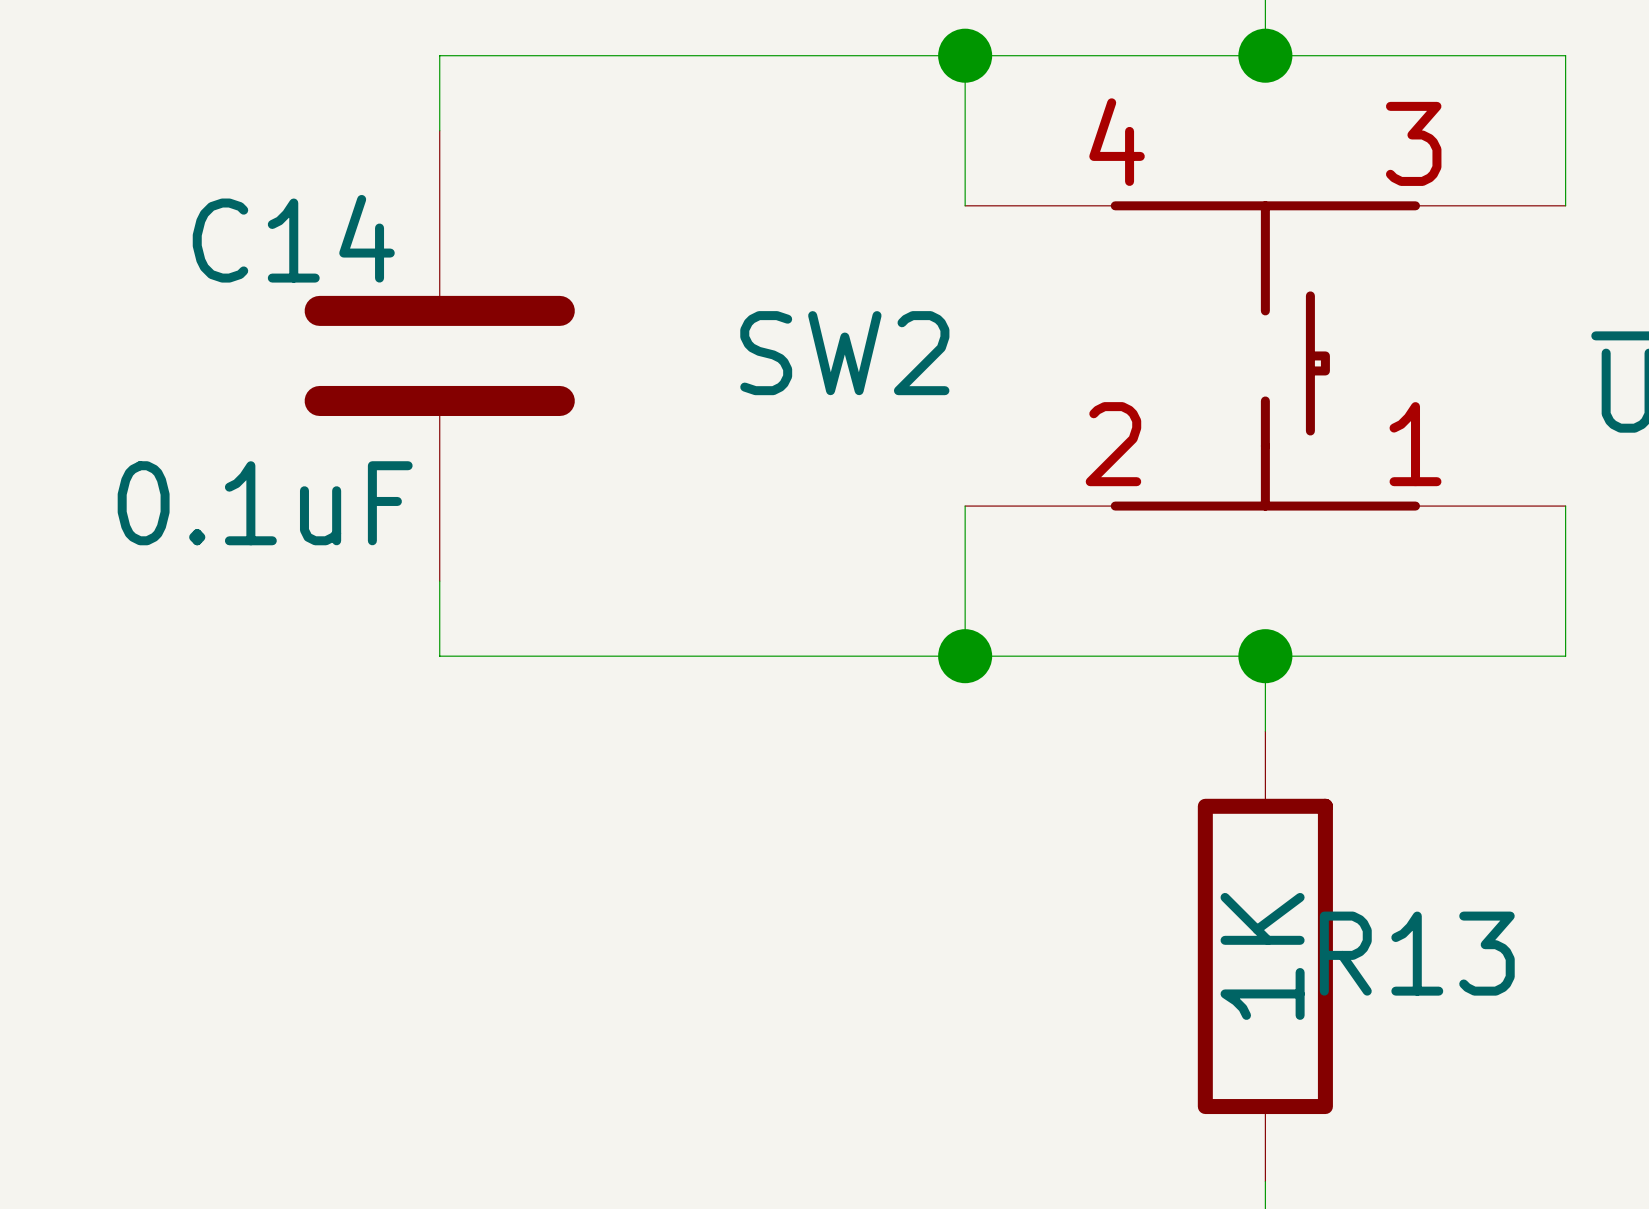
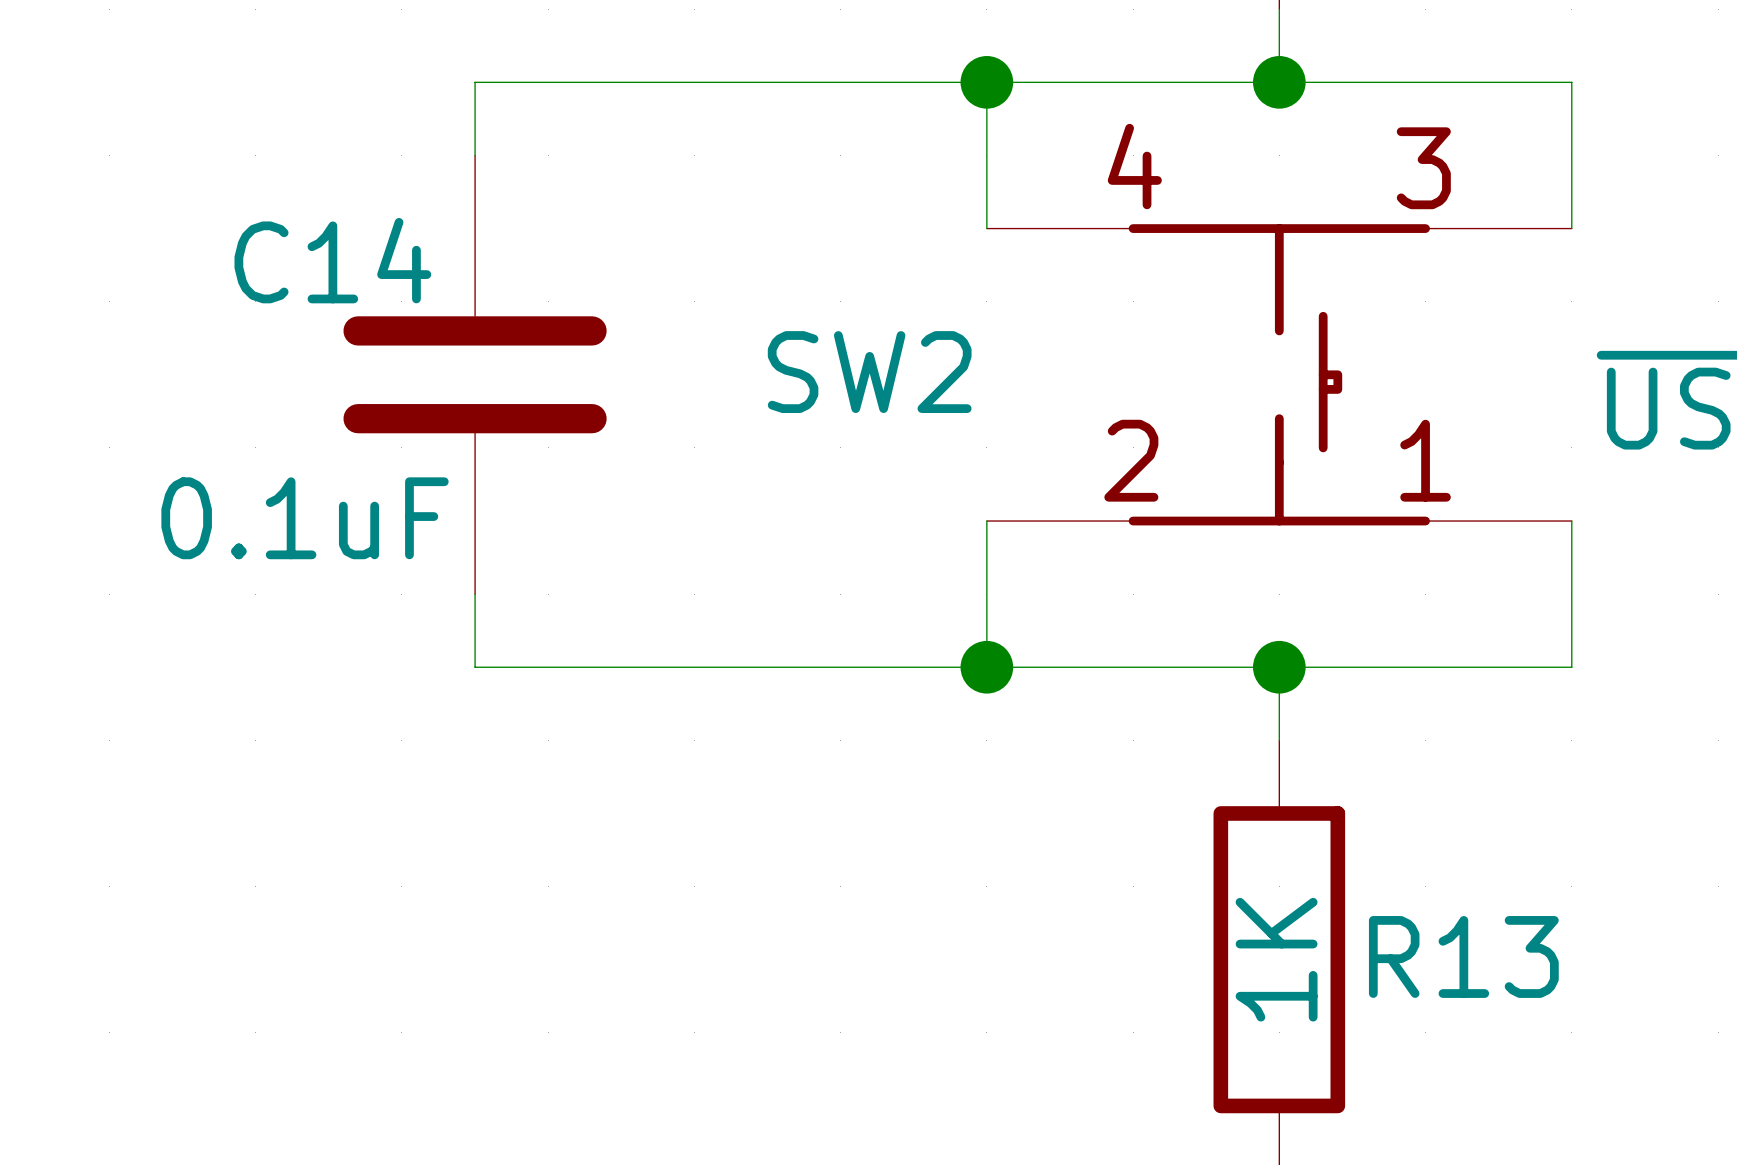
R13 name position: R13 (1417, 953) -> R13 (1463, 956)

